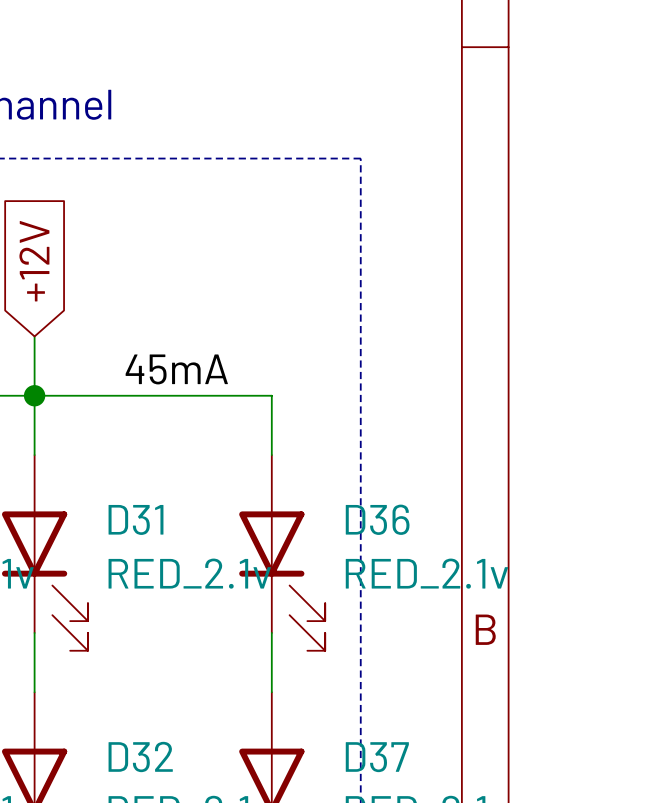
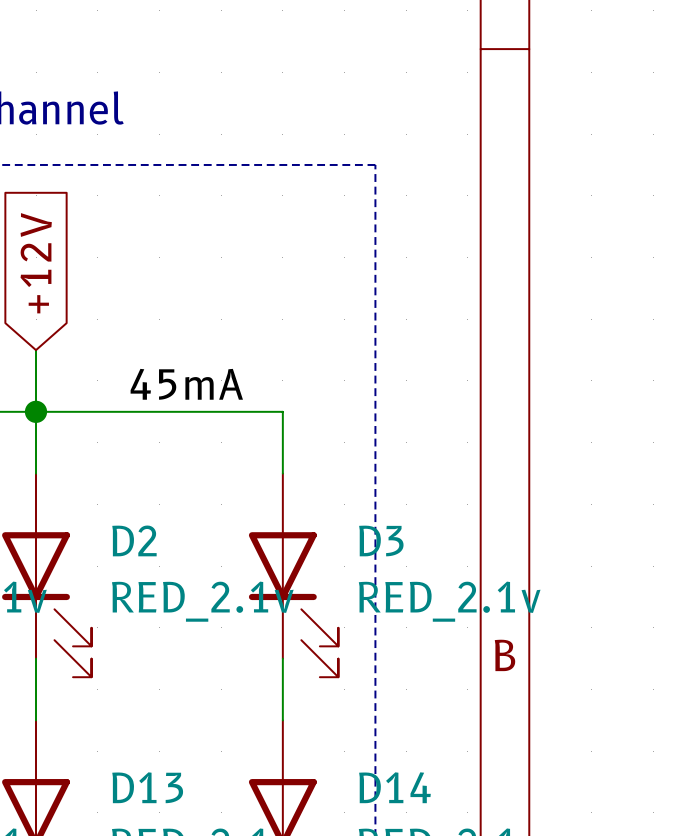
D31 name: D31 (136, 519) -> D2 (134, 540)
D36 name: D36 (377, 519) -> D3 (381, 540)
D32 name: D32 (140, 756) -> D13 (147, 787)
D37 name: D37 (377, 757) -> D14 (394, 787)

